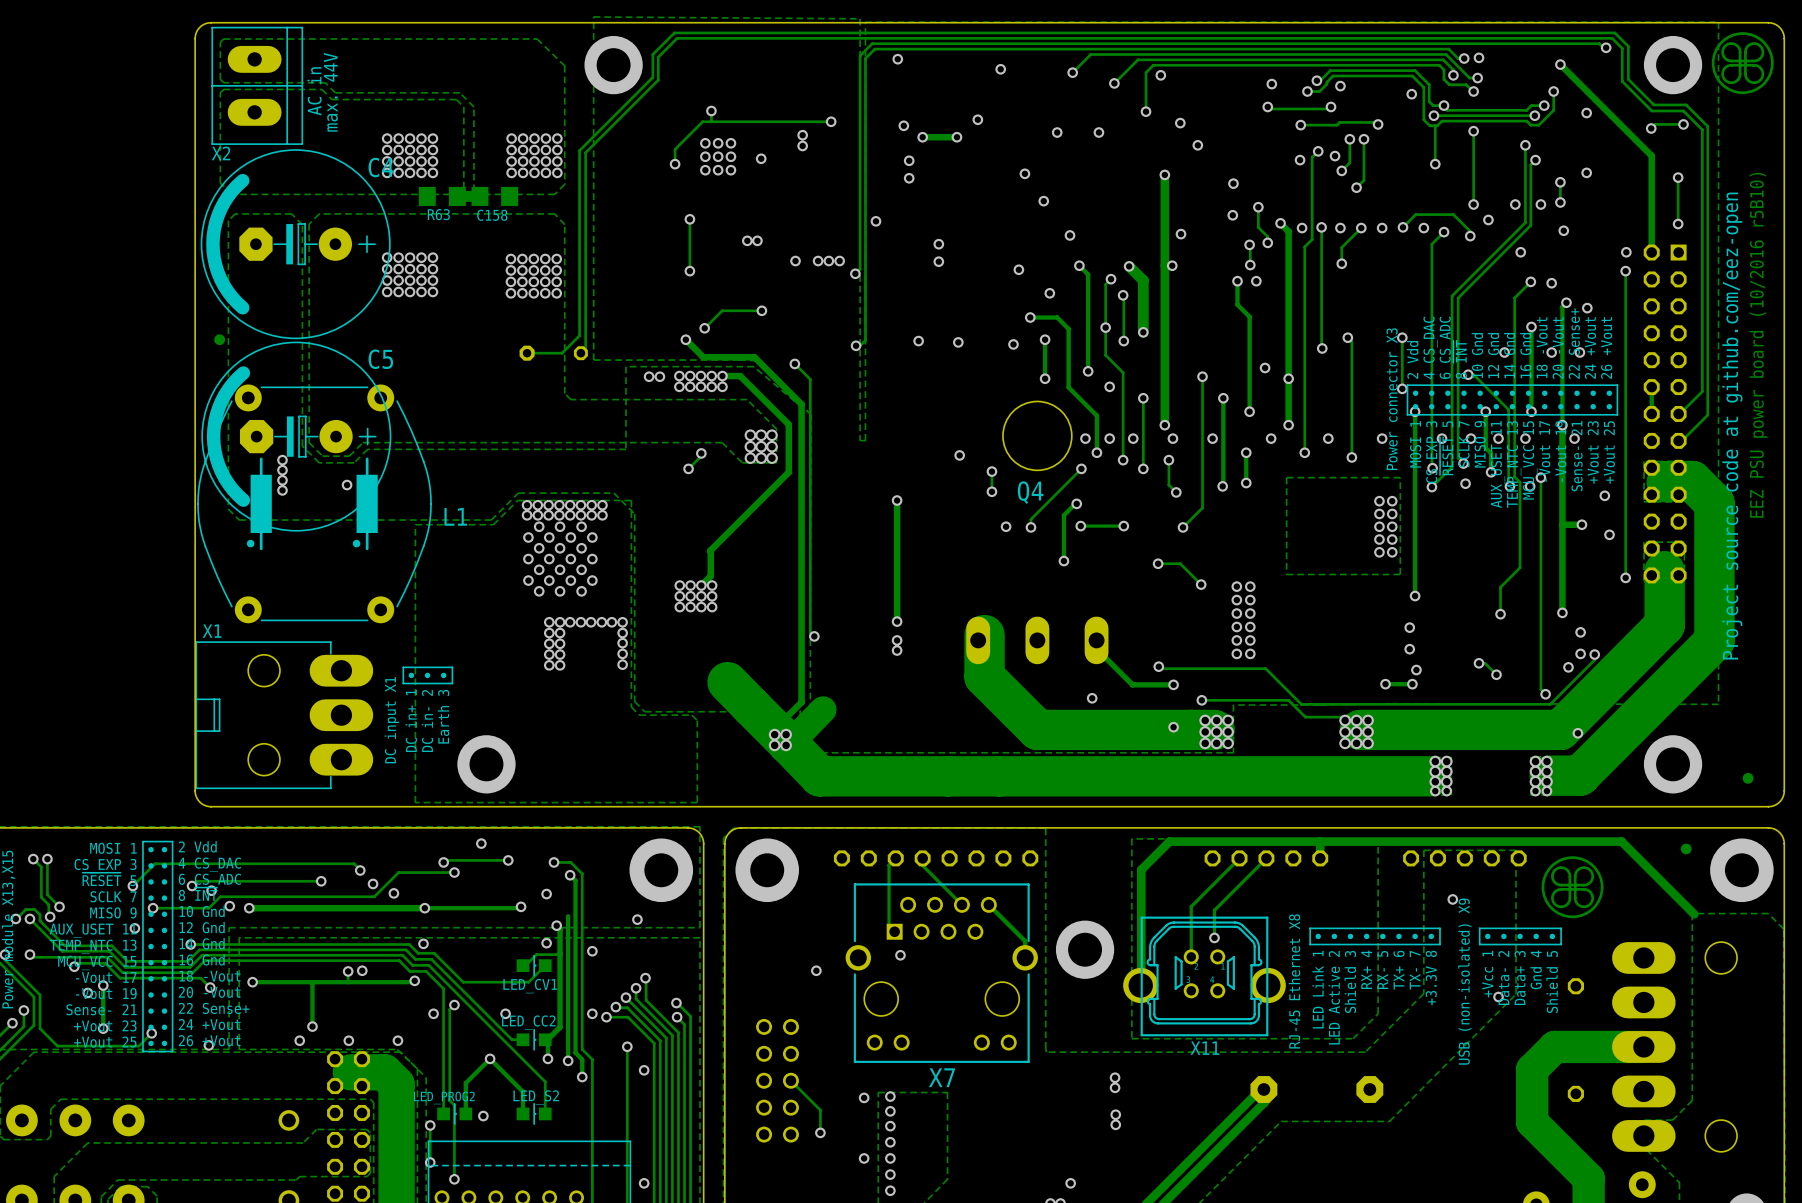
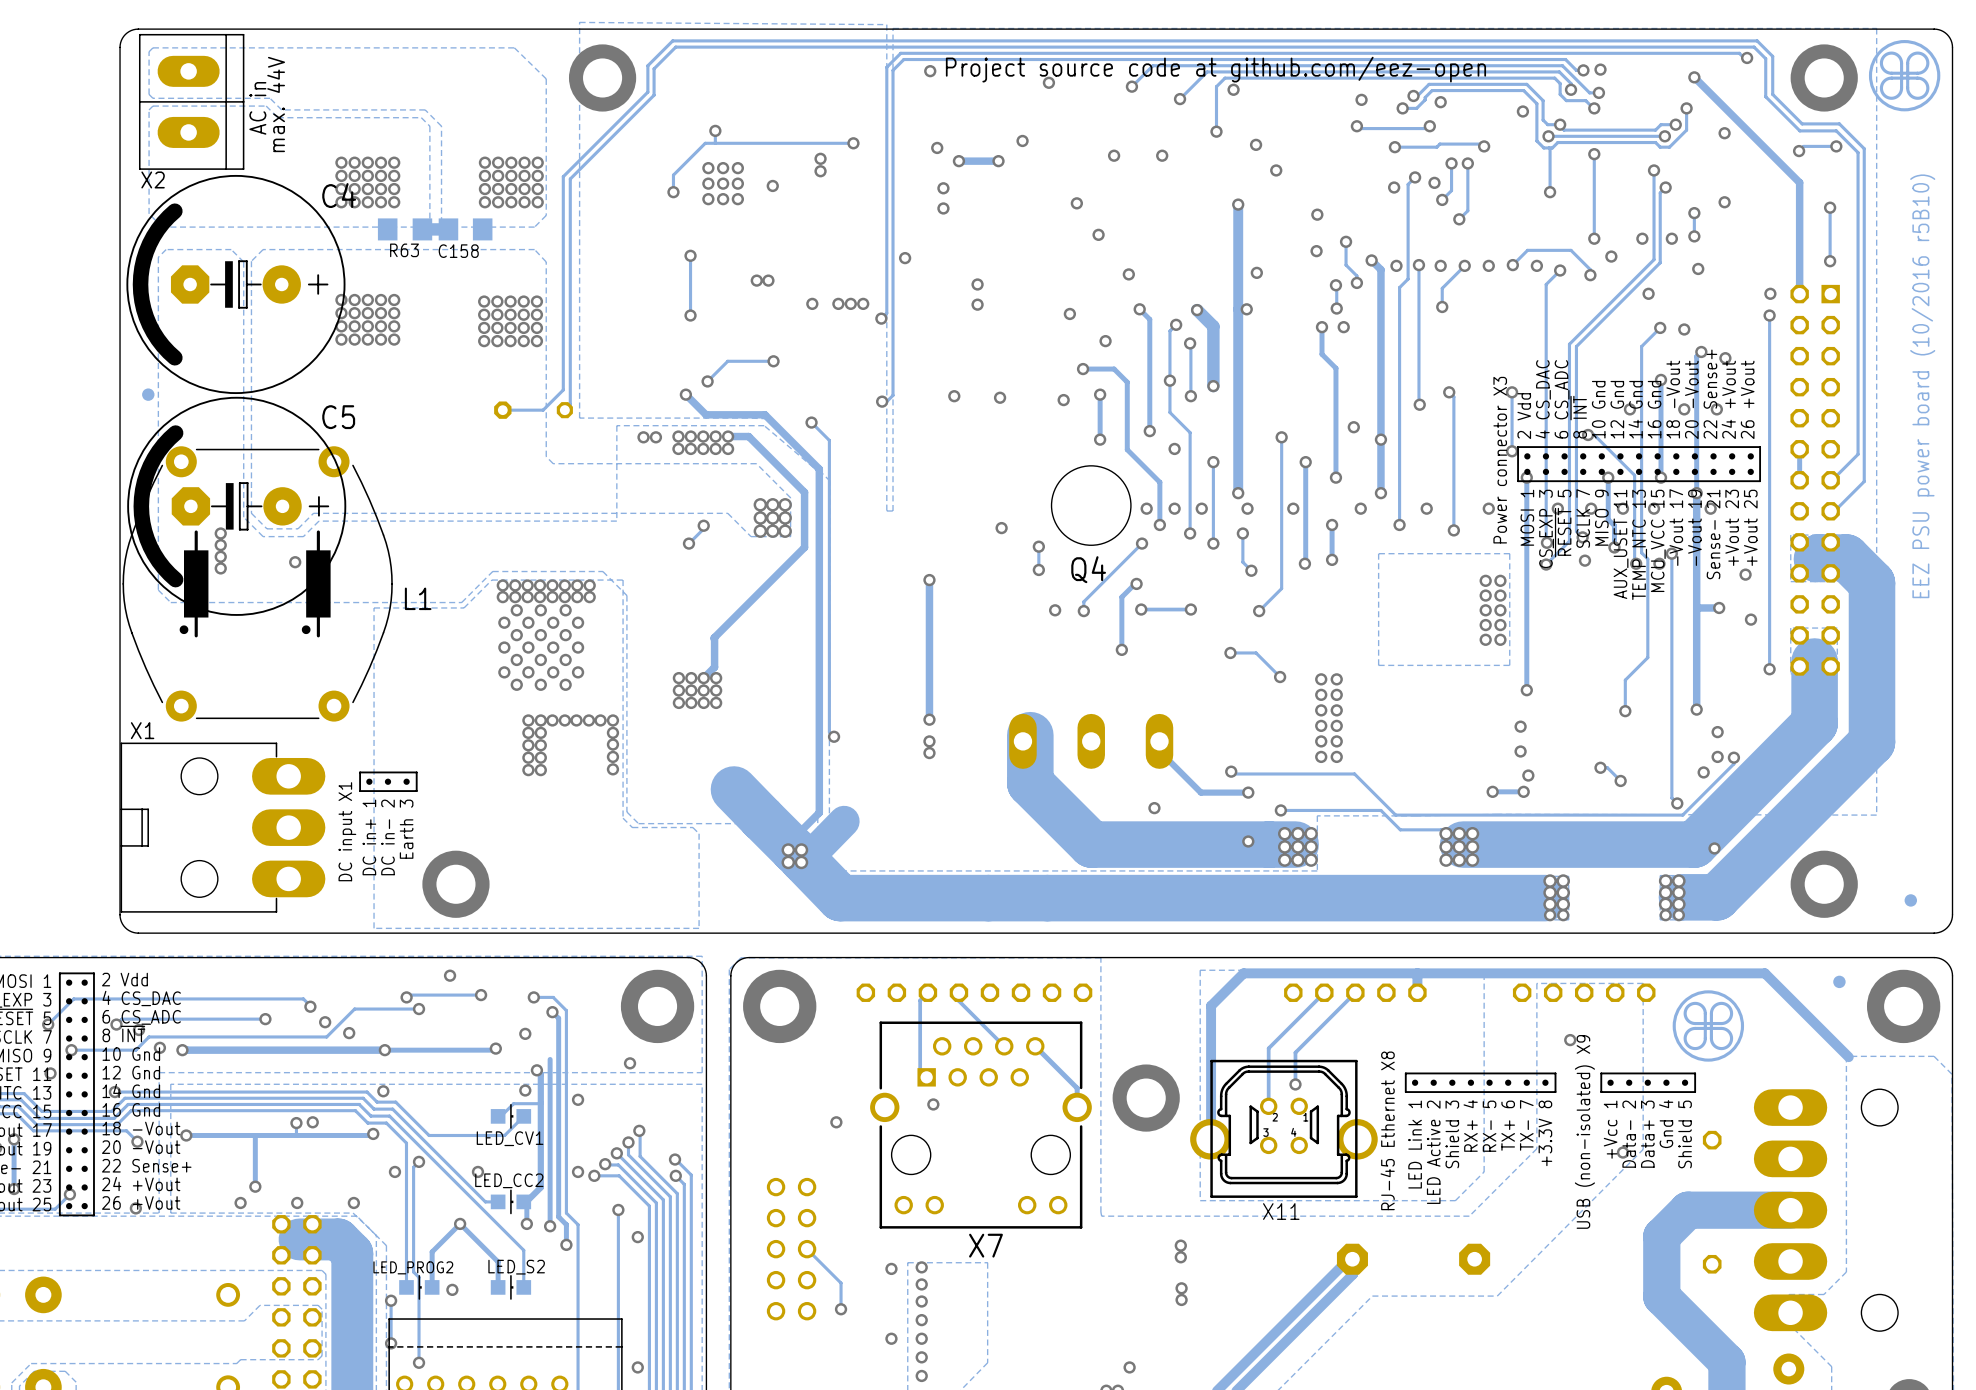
text: none -> Project source code at github.com/eez-open (1215, 69)
text: Project source code at github.com/eez-open (1732, 426) -> none

